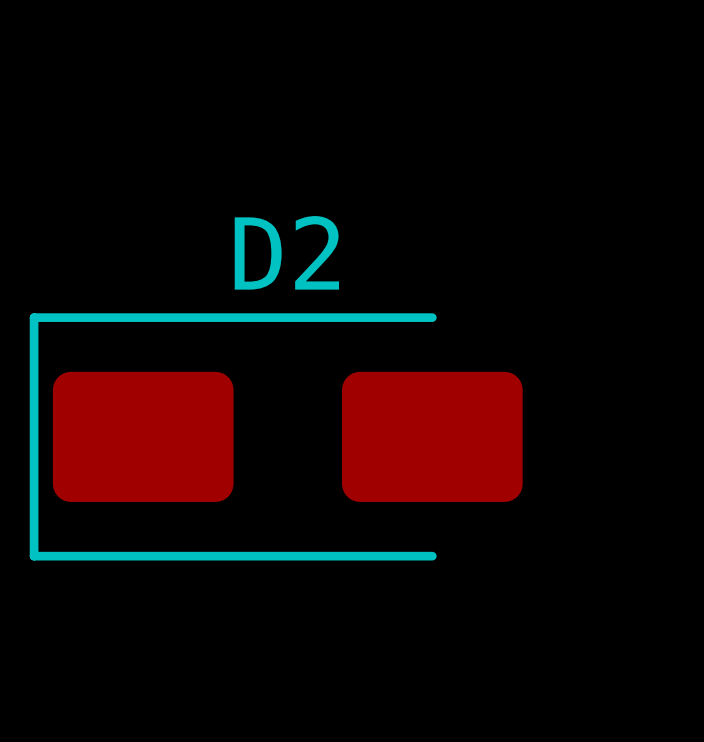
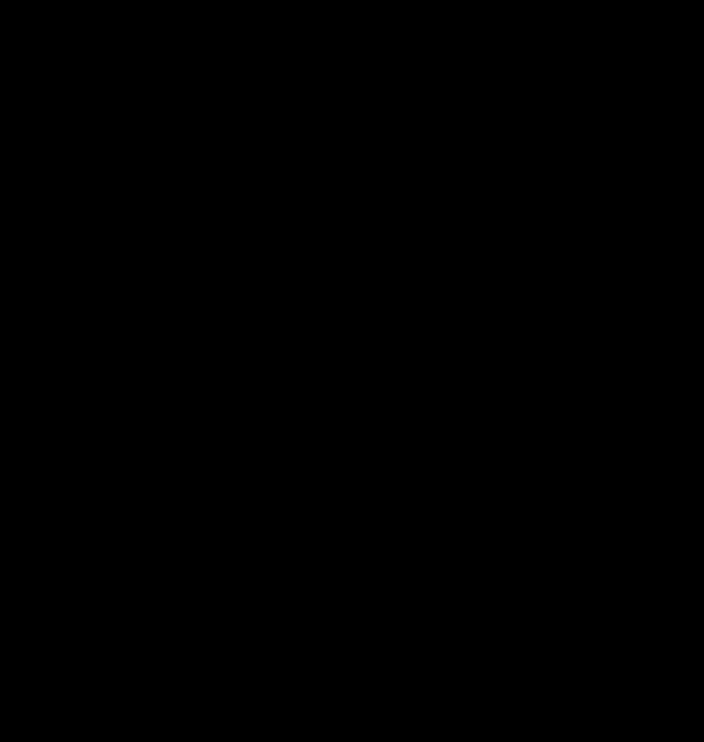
D2: (276, 436) -> none

